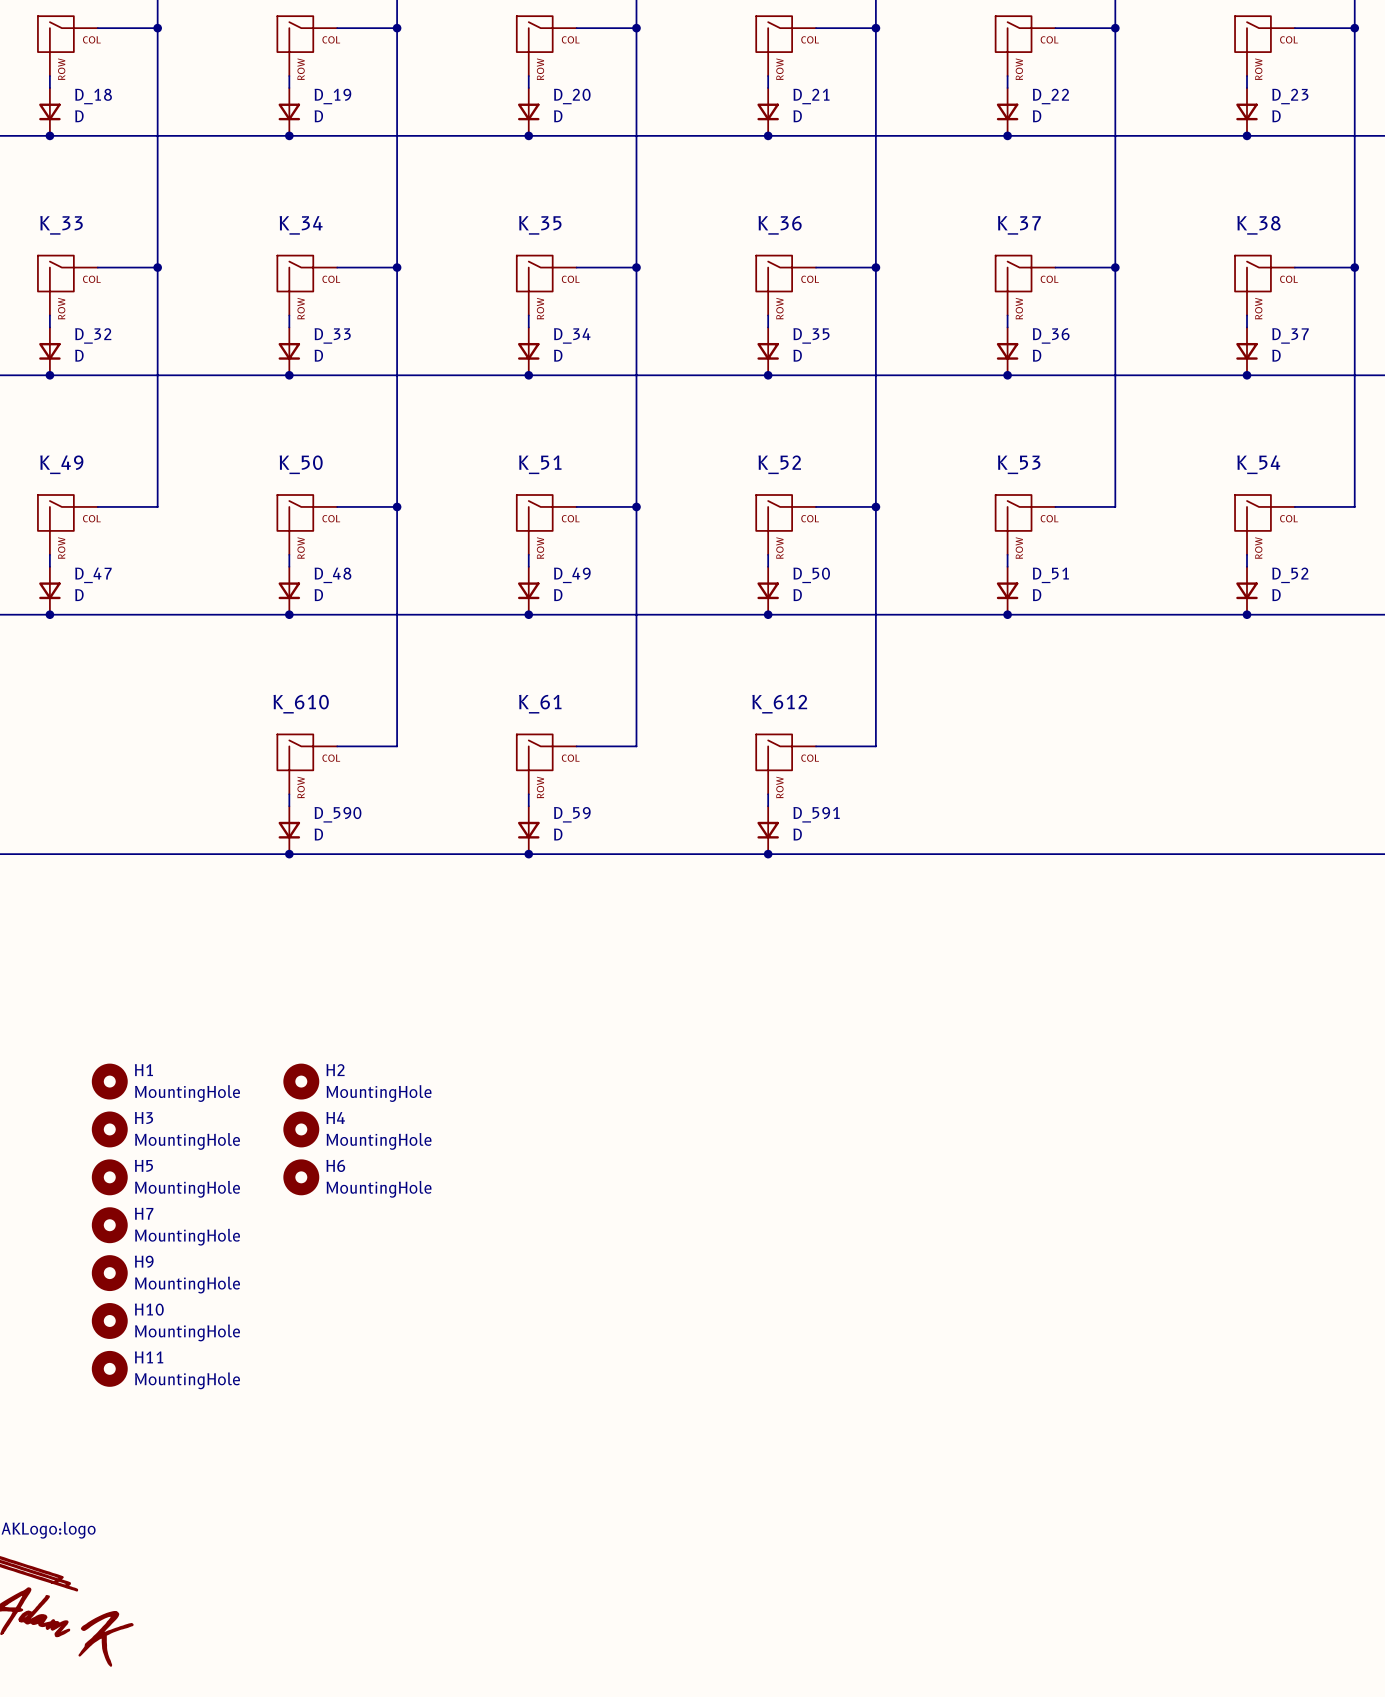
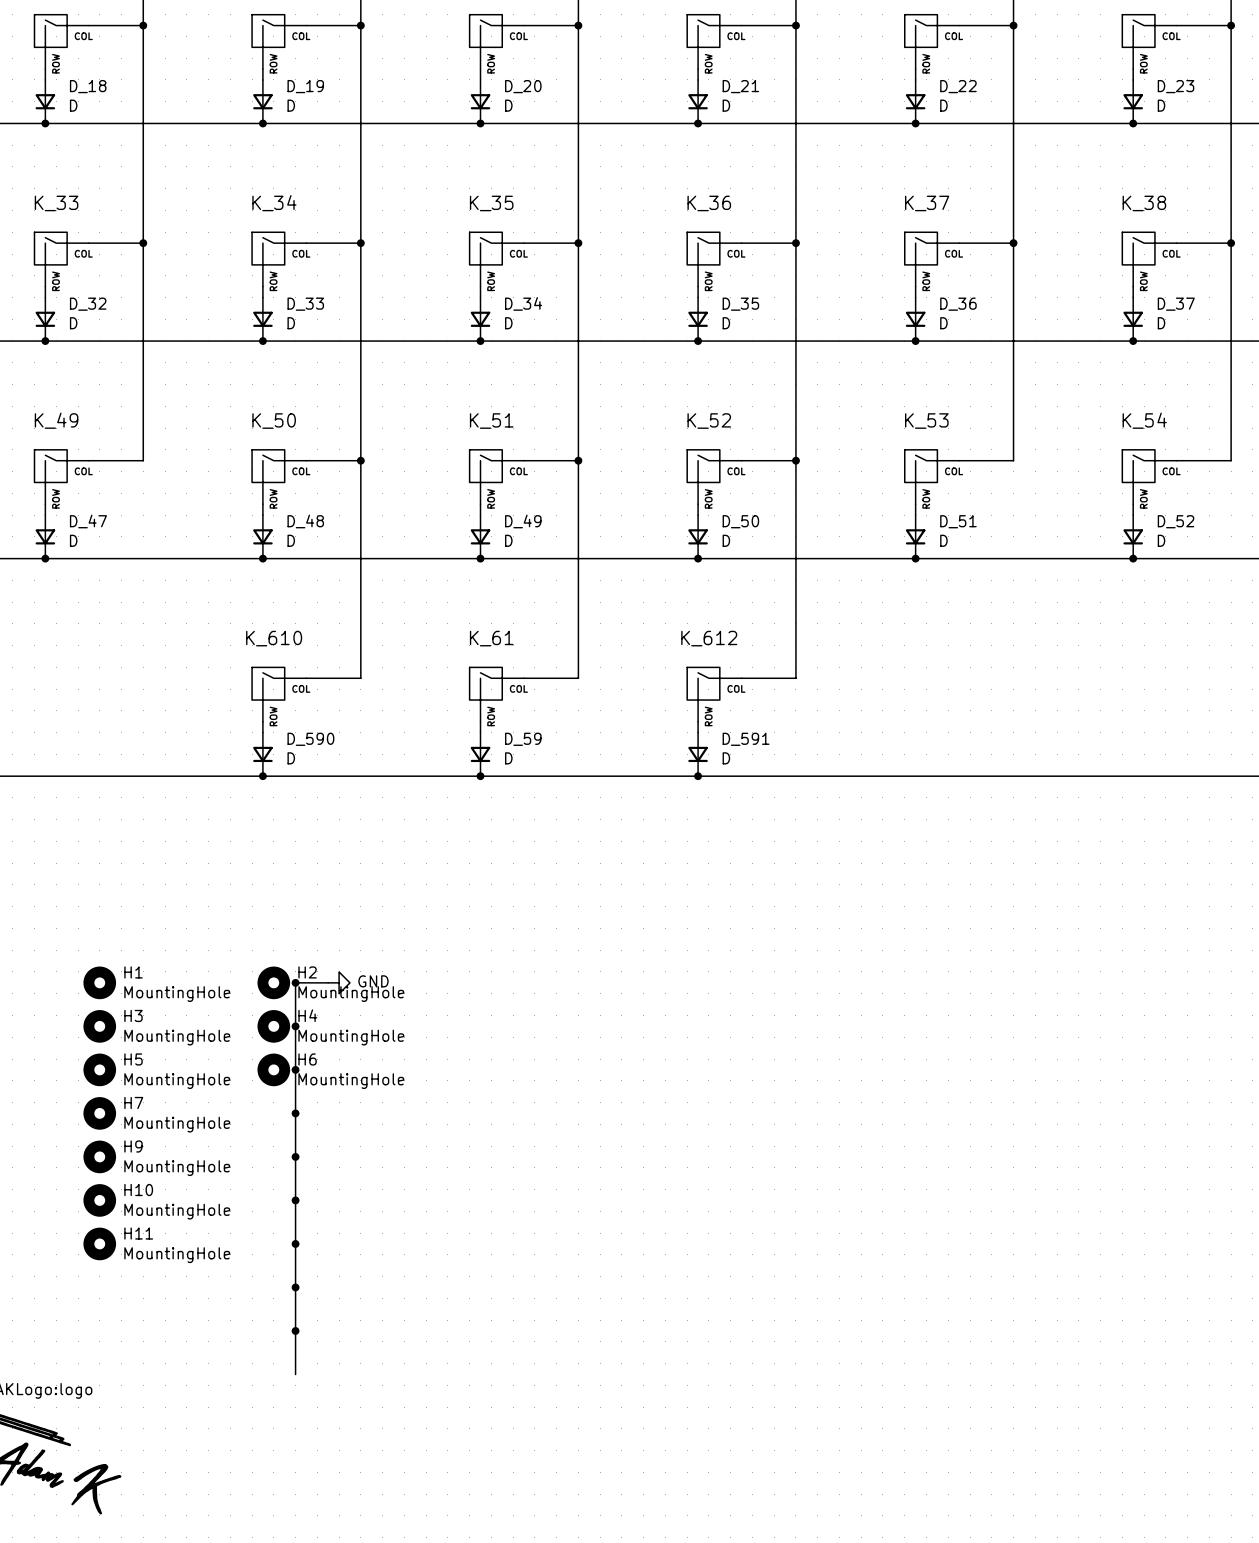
junction: none -> (295, 982)
wire: none -> (328, 982) (295, 982) (295, 1374)
power symbol: none -> GND (339, 982)
junction: none -> (295, 1026)
junction: none -> (295, 1069)
junction: none -> (295, 1113)
junction: none -> (295, 1156)
junction: none -> (295, 1200)
junction: none -> (295, 1243)
junction: none -> (295, 1287)
junction: none -> (295, 1330)

